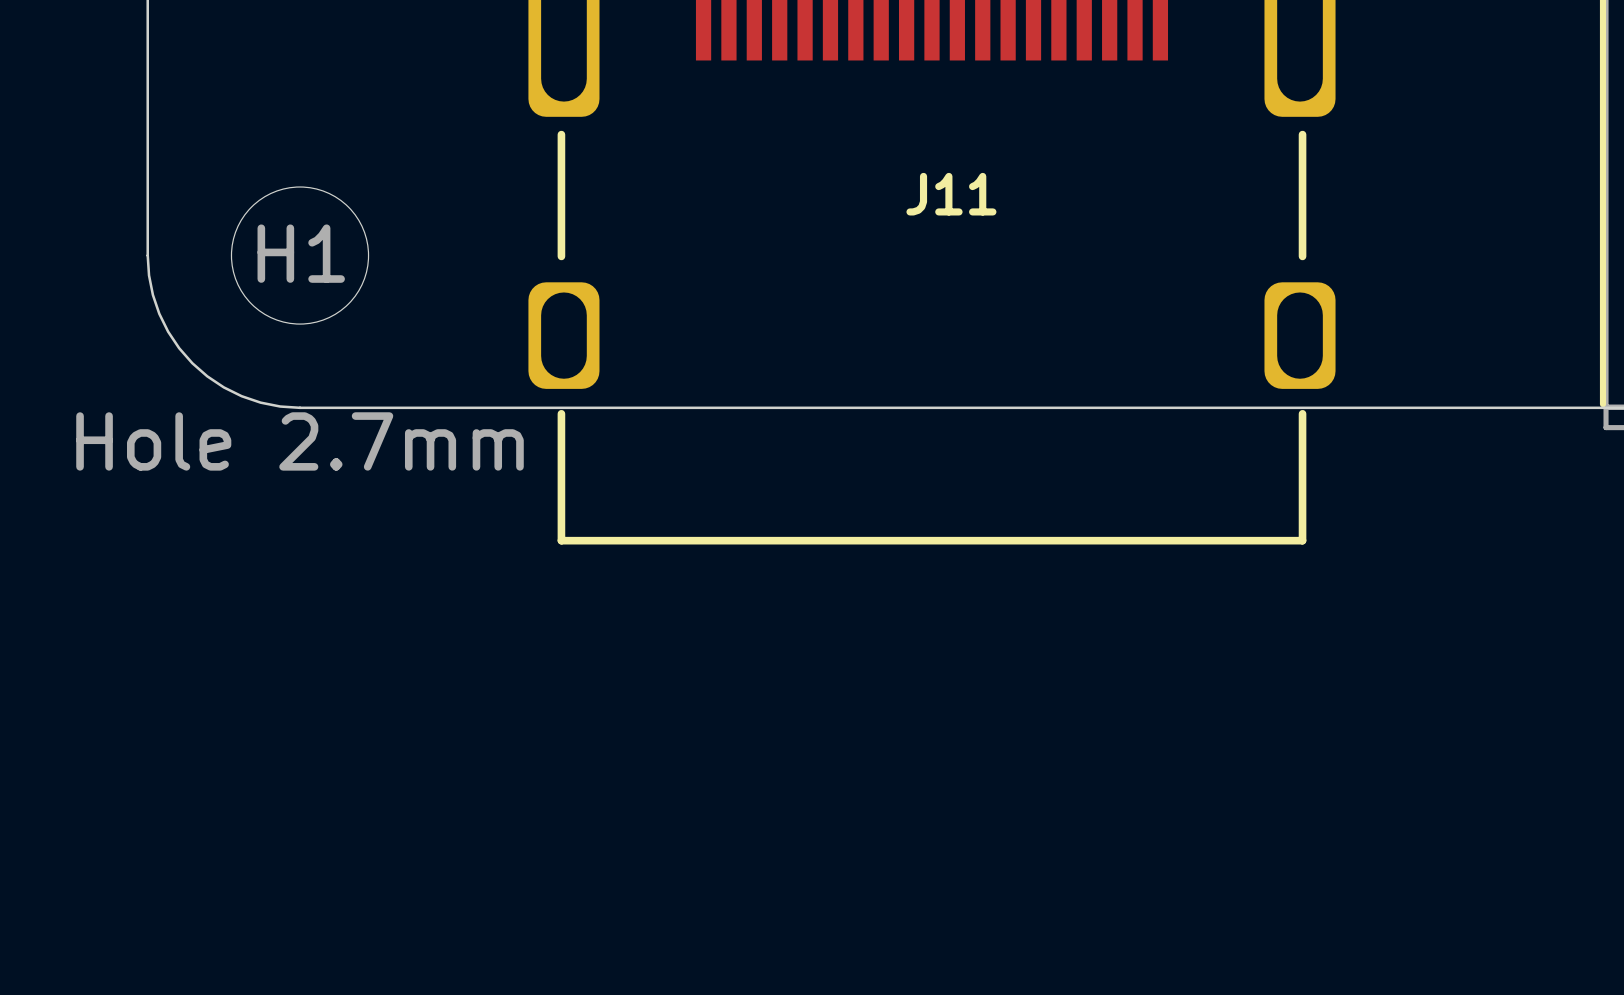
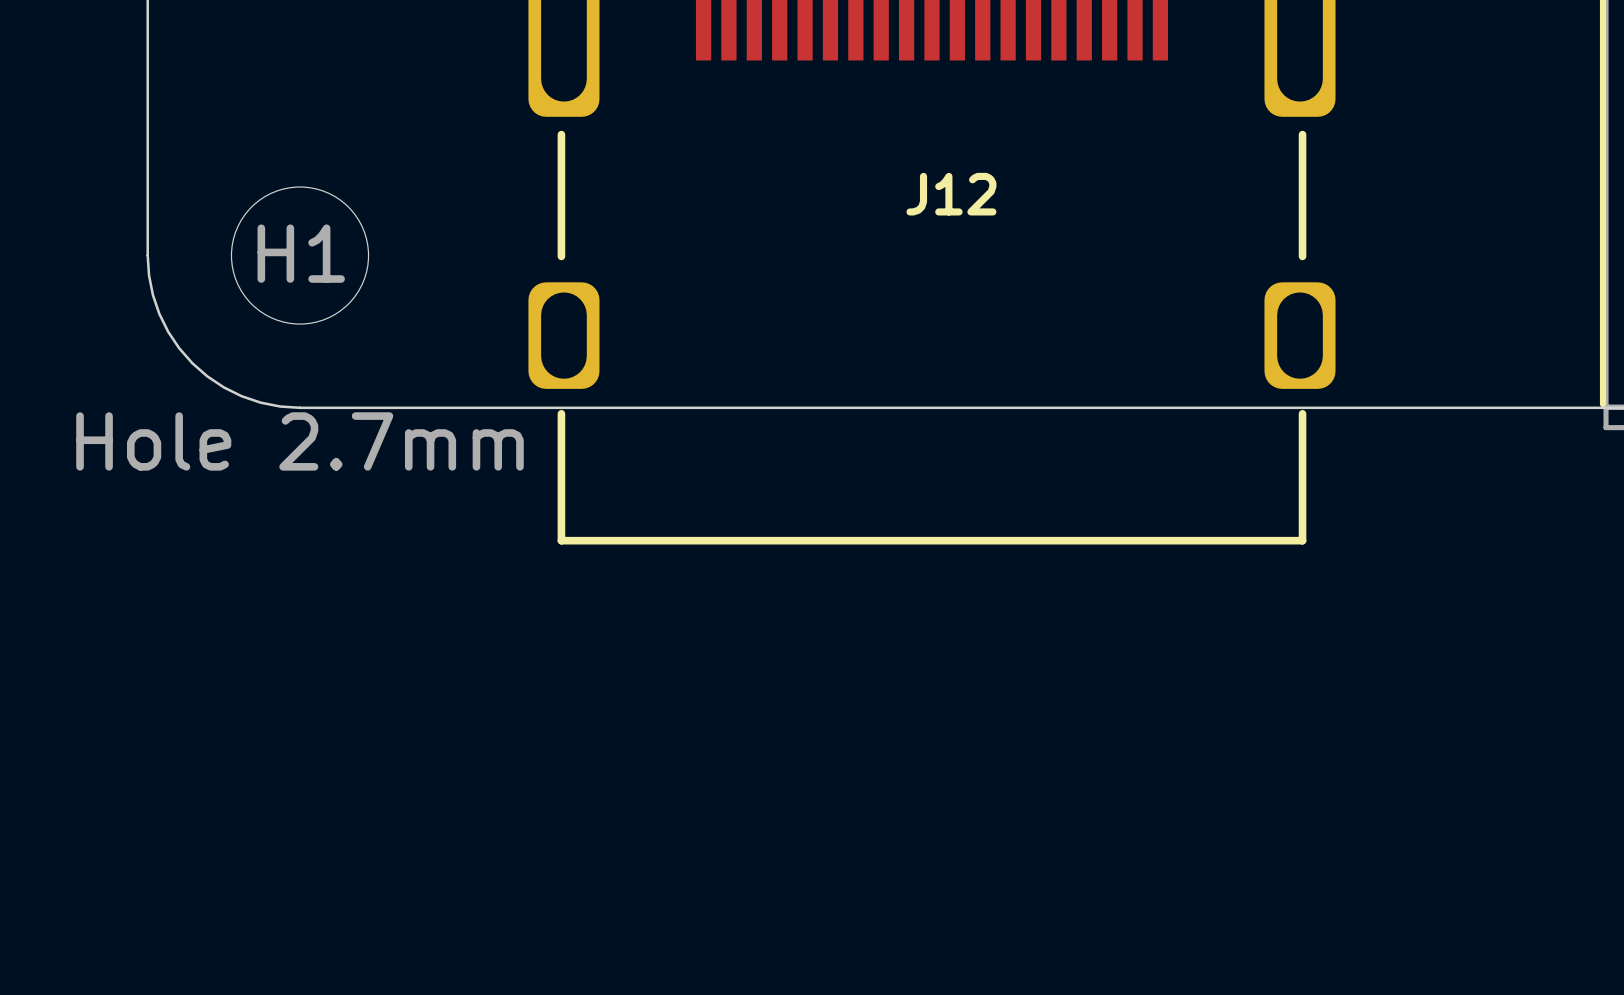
J11 name: J11 (951, 194) -> J12 (951, 194)

